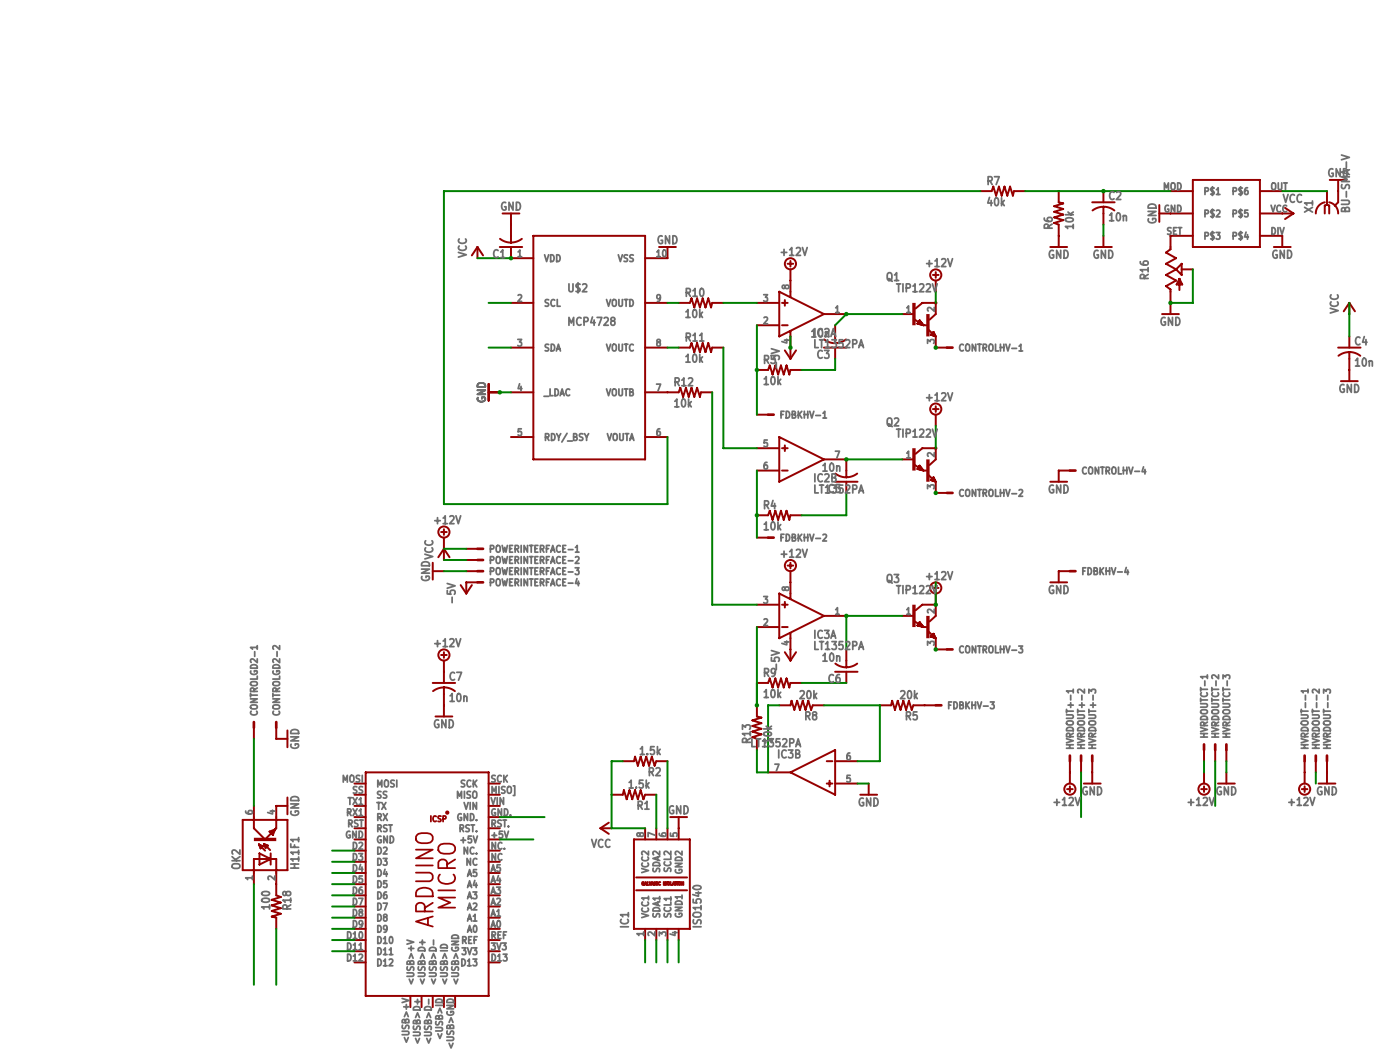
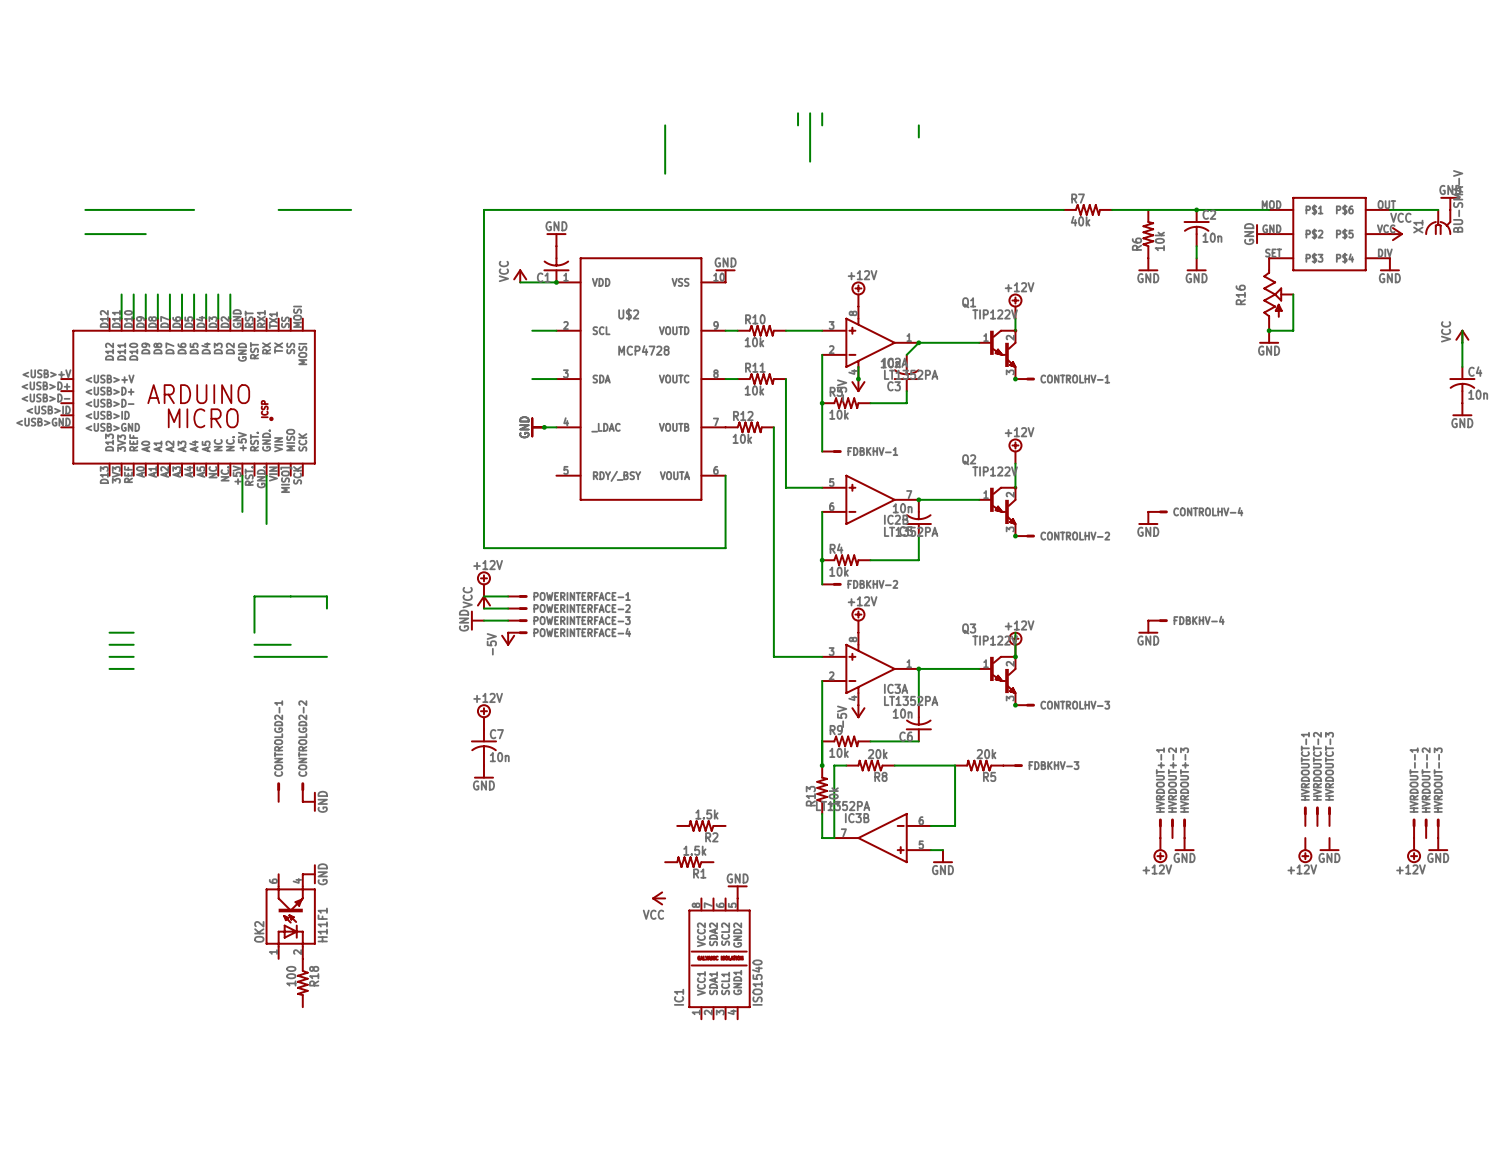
wire: none -> (798, 113) (798, 125)
wire: none -> (810, 113) (810, 161)
wire: none -> (822, 113) (822, 125)
wire: none -> (665, 125) (665, 173)
wire: none -> (918, 125) (918, 137)
wire: none -> (85, 209) (194, 209)
wire: none -> (278, 209) (351, 209)
wire: none -> (85, 234) (145, 234)
wire: none -> (121, 294) (121, 318)
wire: none -> (133, 294) (133, 318)
wire: none -> (145, 294) (145, 318)
wire: none -> (157, 294) (157, 318)
wire: none -> (169, 294) (169, 318)
wire: none -> (182, 294) (182, 318)
wire: none -> (194, 294) (194, 318)
wire: none -> (206, 294) (206, 318)
wire: none -> (218, 294) (218, 318)
wire: none -> (230, 294) (230, 318)
part: none -> (188, 397)
wire: none -> (242, 475) (242, 511)
wire: none -> (266, 475) (266, 523)
wire: none -> (326, 608) (326, 596) (254, 596) (254, 632)
wire: none -> (109, 632) (133, 632)
wire: none -> (109, 644) (133, 644)
wire: none -> (254, 644) (290, 644)
wire: none -> (109, 656) (133, 656)
wire: none -> (254, 656) (326, 656)
wire: none -> (109, 668) (133, 668)
wire: (253, 738) (253, 805) -> none
wire: (622, 761) (611, 761) (611, 828) (645, 828) -> none
wire: (667, 761) (667, 828) -> none
wire: (1204, 761) (1204, 772) -> none
wire: (1215, 761) (1215, 805) -> none
wire: (1226, 761) (1226, 772) -> none
wire: (1081, 772) (1081, 817) -> none
wire: (1315, 772) (1315, 783) -> none
wire: (656, 794) (656, 828) -> none
wire: (499, 817) (544, 817) -> none
wire: (499, 839) (533, 839) -> none
wire: (332, 850) (354, 850) -> none
wire: (332, 861) (354, 861) -> none
wire: (332, 872) (354, 872) -> none
wire: (253, 884) (253, 984) -> none
wire: (332, 884) (354, 884) -> none
part: (427, 889) -> none
wire: (332, 895) (354, 895) -> none
wire: (332, 906) (354, 906) -> none
wire: (332, 917) (354, 917) -> none
wire: (276, 928) (276, 984) -> none
wire: (332, 928) (354, 928) -> none
wire: (332, 940) (354, 940) -> none
wire: (645, 940) (645, 962) -> none
wire: (656, 940) (656, 962) -> none
wire: (667, 940) (667, 962) -> none
wire: (678, 940) (678, 962) -> none
wire: (332, 951) (354, 951) -> none

